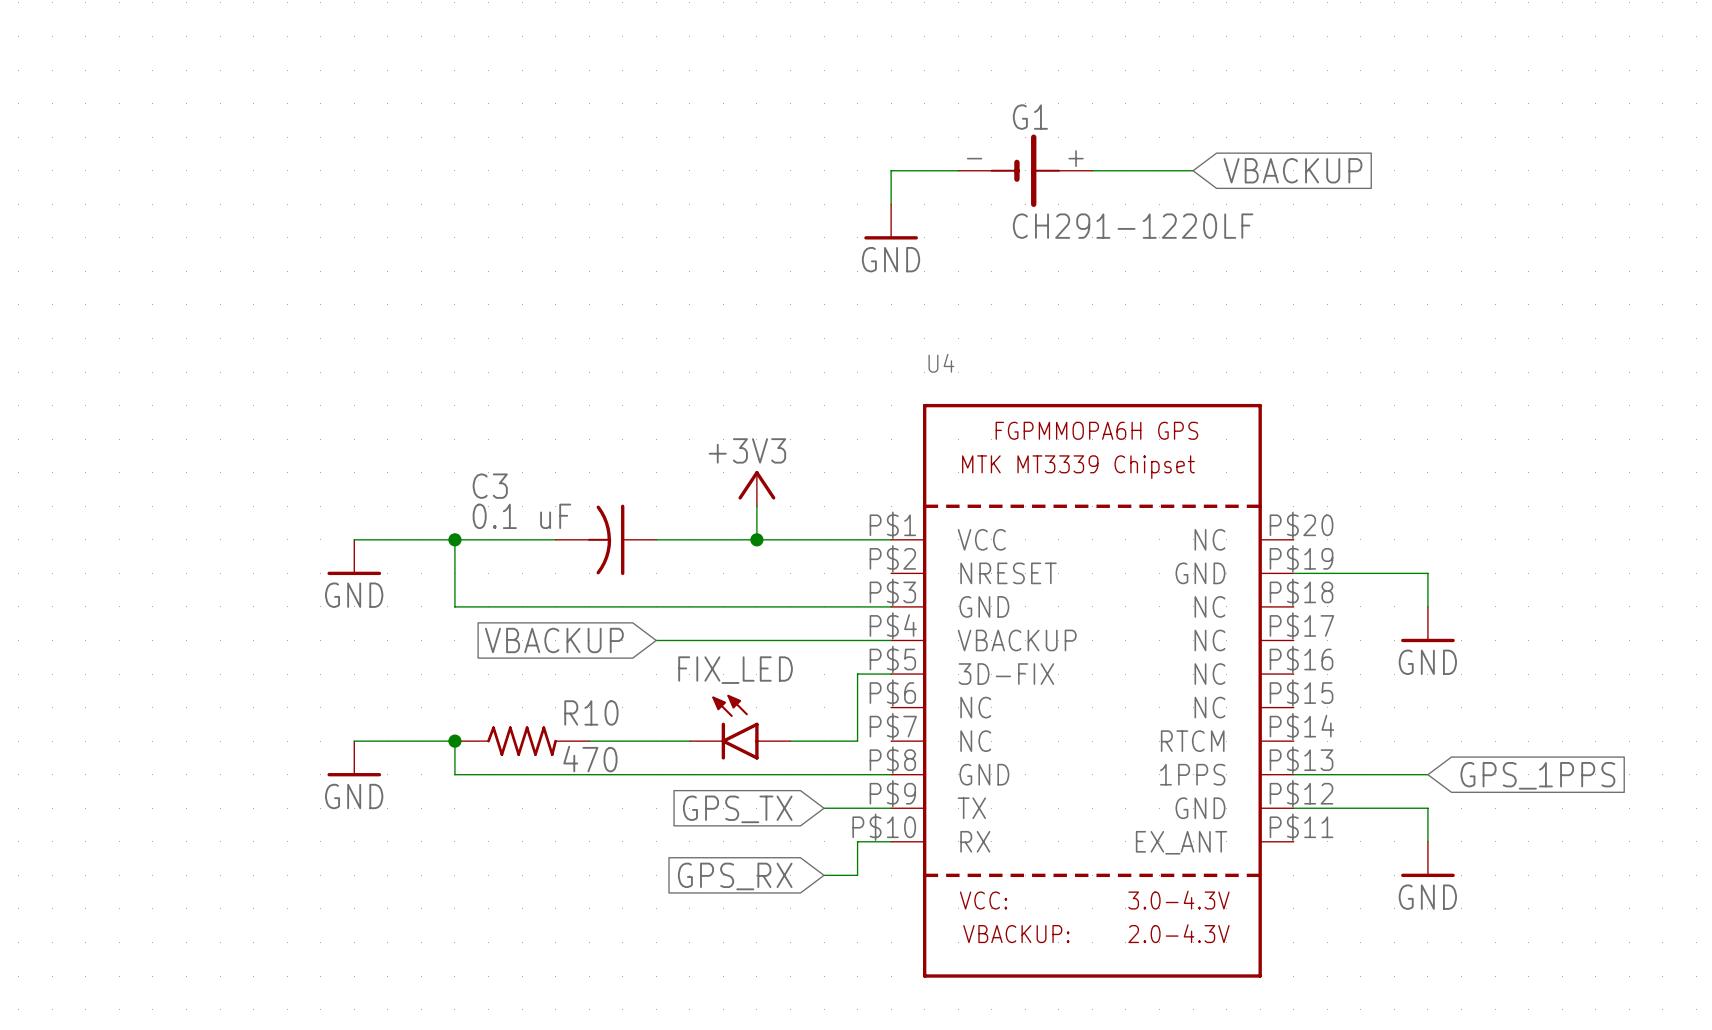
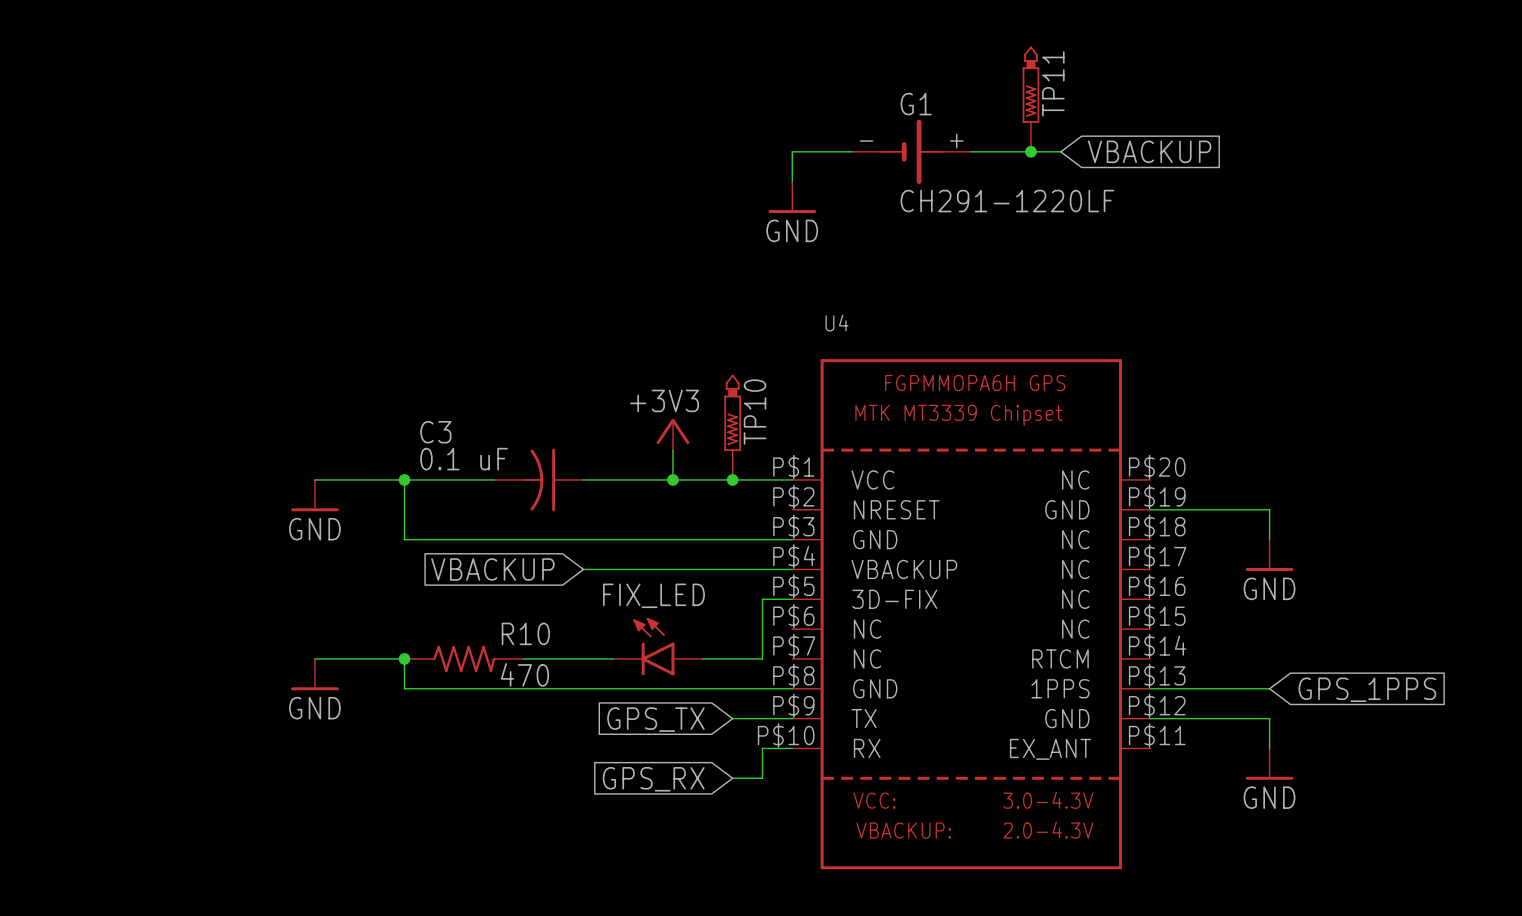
TP11: none -> (1030, 99)
junction: none -> (1030, 151)
TP10: none -> (732, 427)
junction: none -> (732, 479)

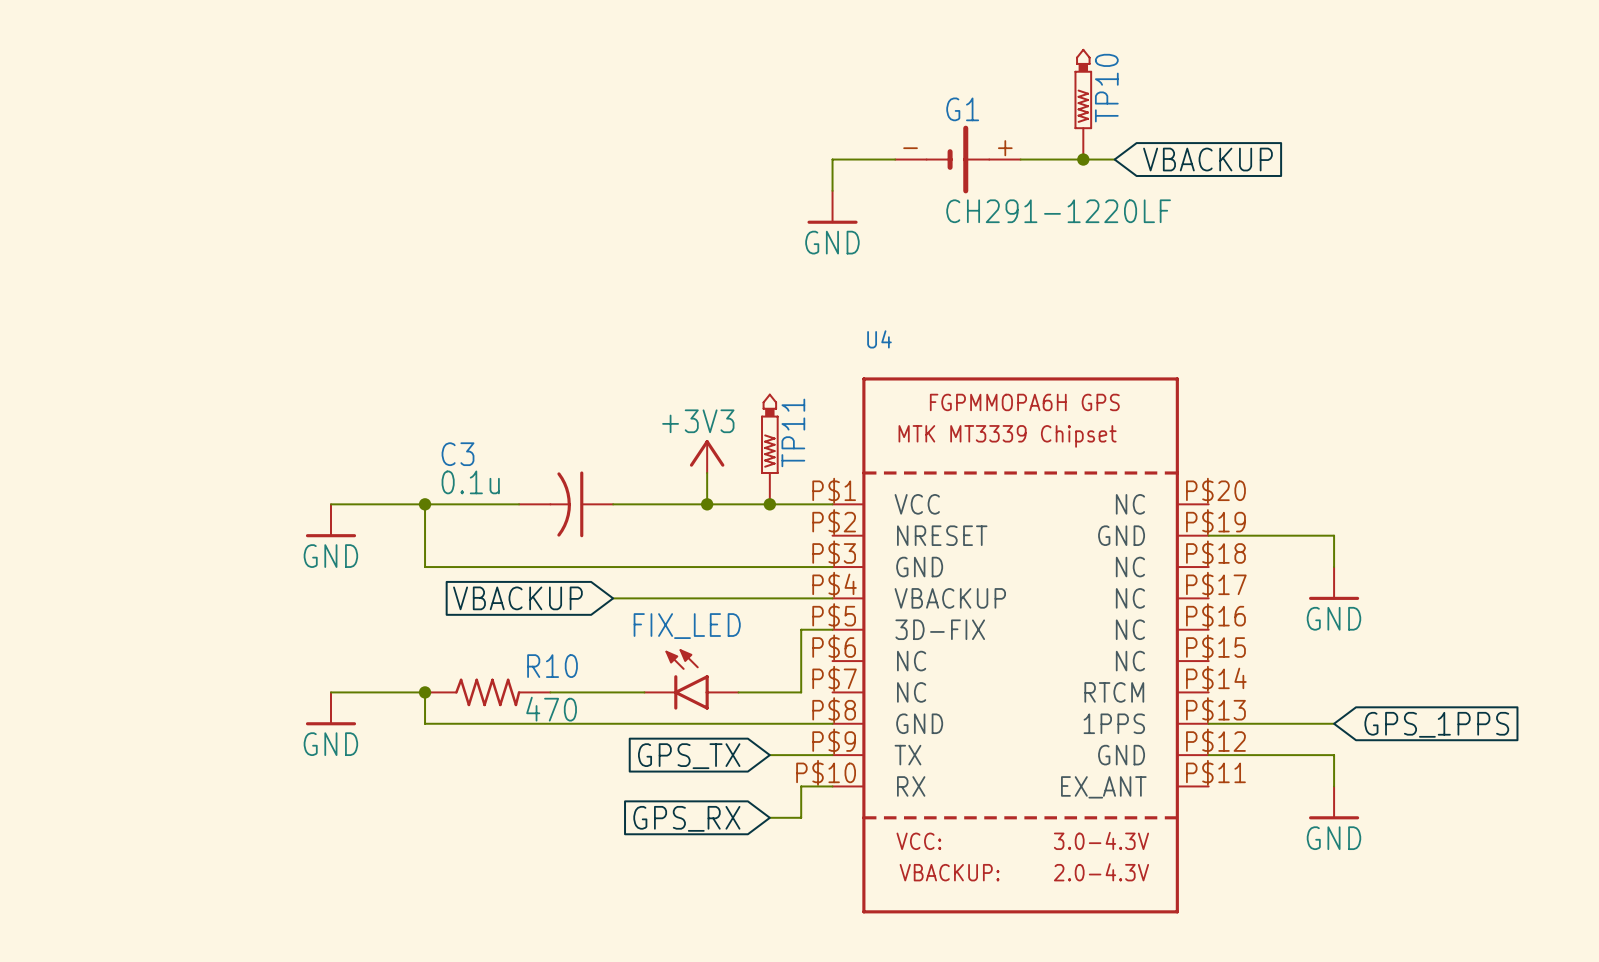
TP11 name: TP11 (1053, 83) -> TP10 (1106, 88)
TP10 name: TP10 (755, 412) -> TP11 (793, 432)
C3 value: 0.1 uF (464, 459) -> 0.1u (470, 482)

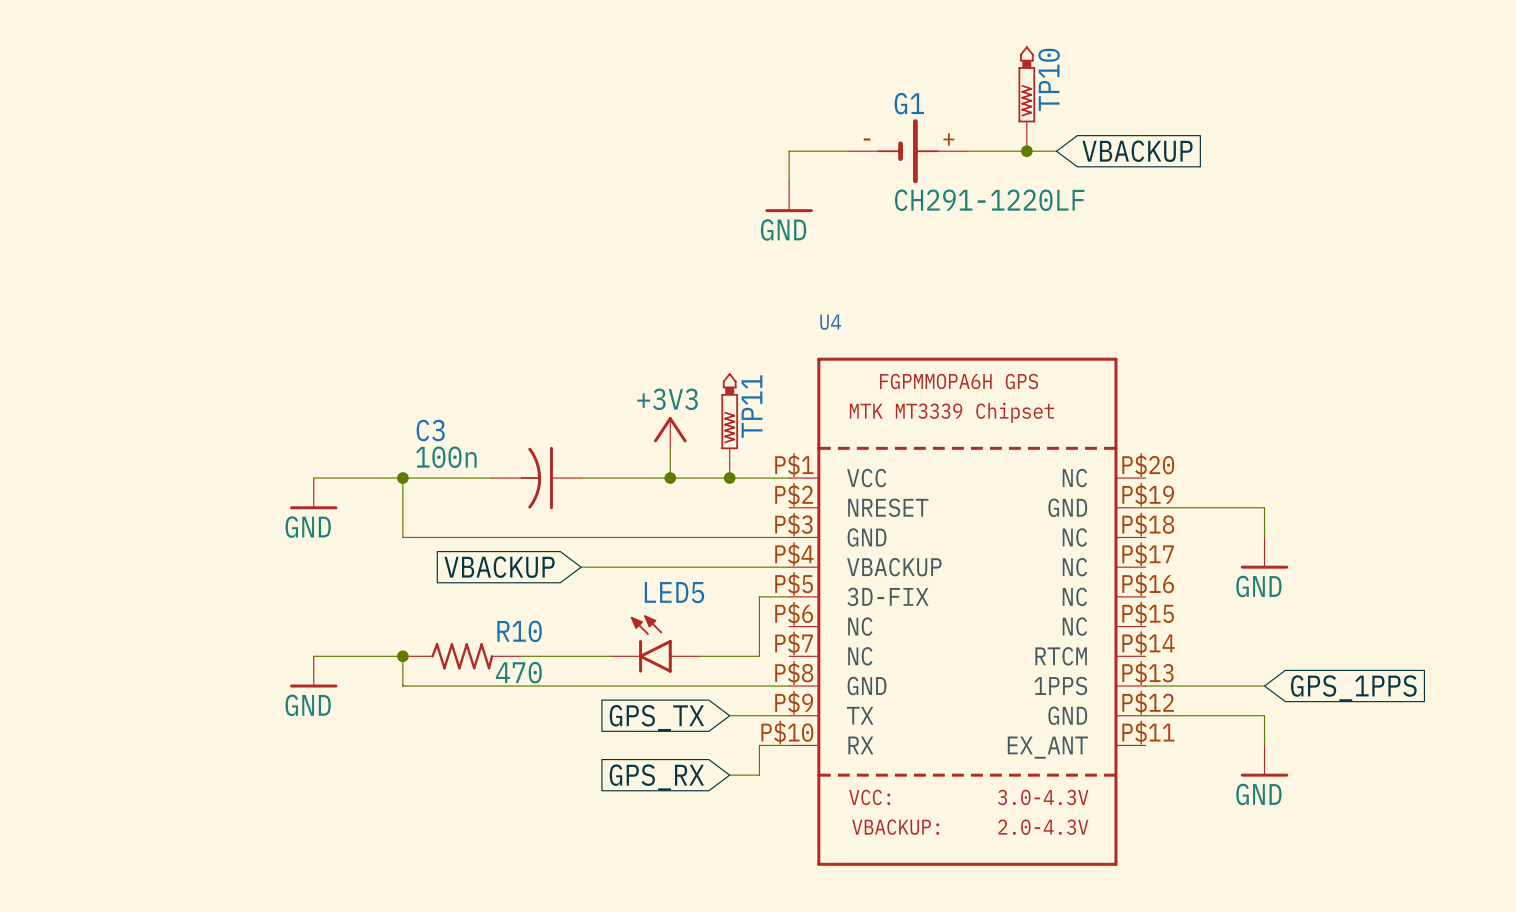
C3 value: 0.1u (470, 482) -> 100n (446, 457)
FIX_LED name: FIX_LED (687, 626) -> LED5 (674, 592)

